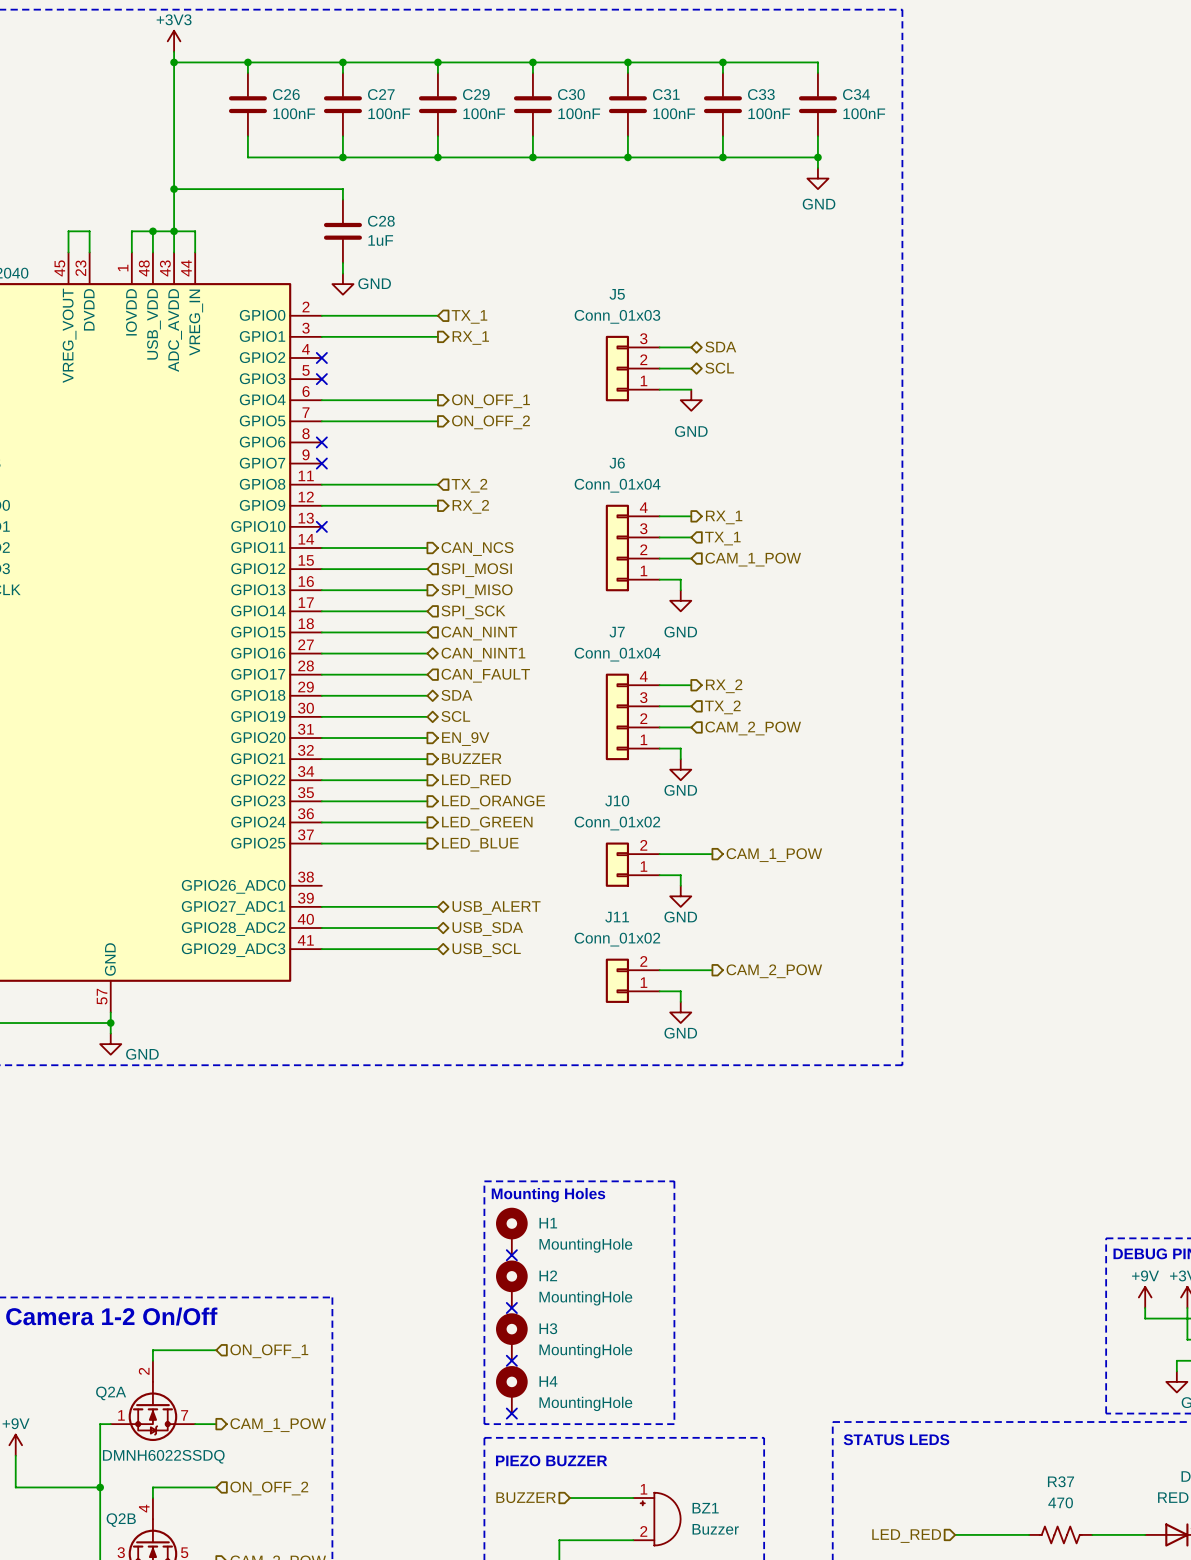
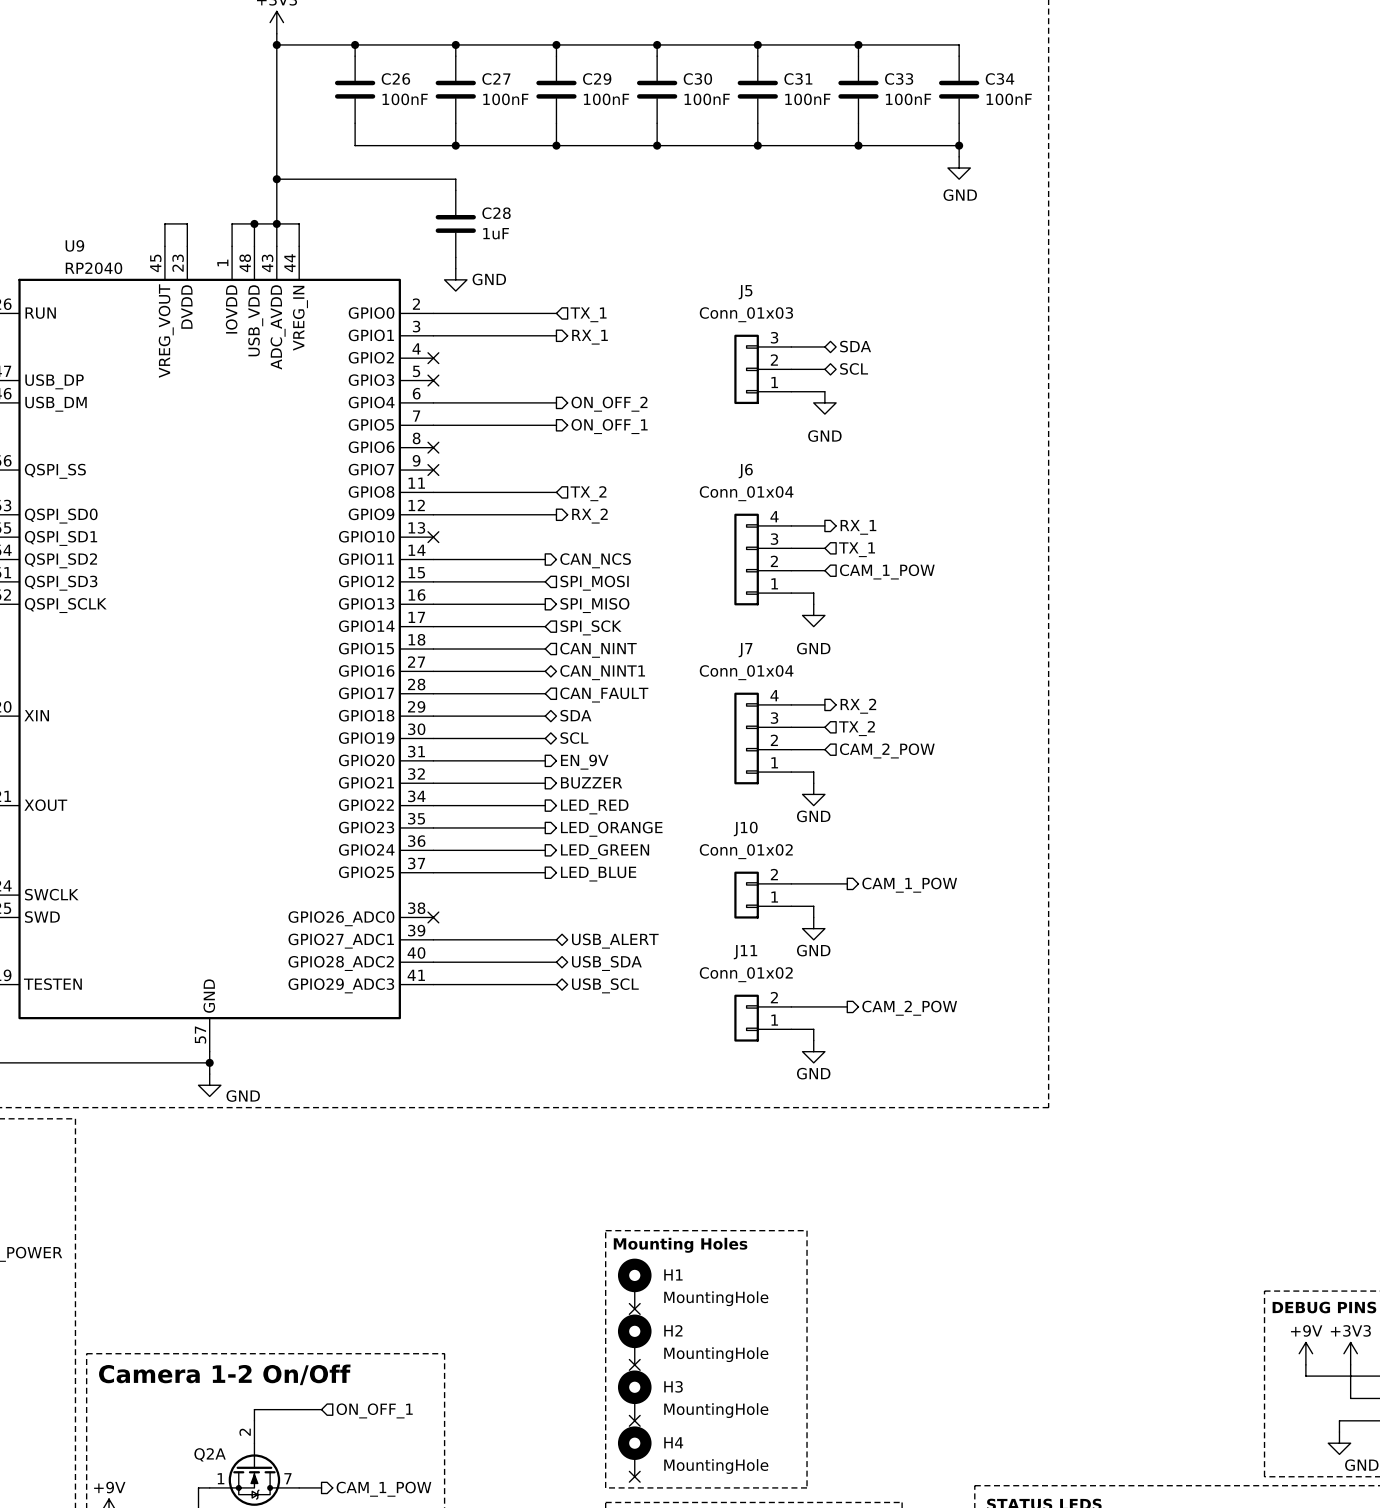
hierarchical label: ON_OFF_1 (491, 401) -> ON_OFF_2 (609, 404)
hierarchical label: ON_OFF_2 (490, 422) -> ON_OFF_1 (609, 426)
no-connect mark: none -> (433, 917)

